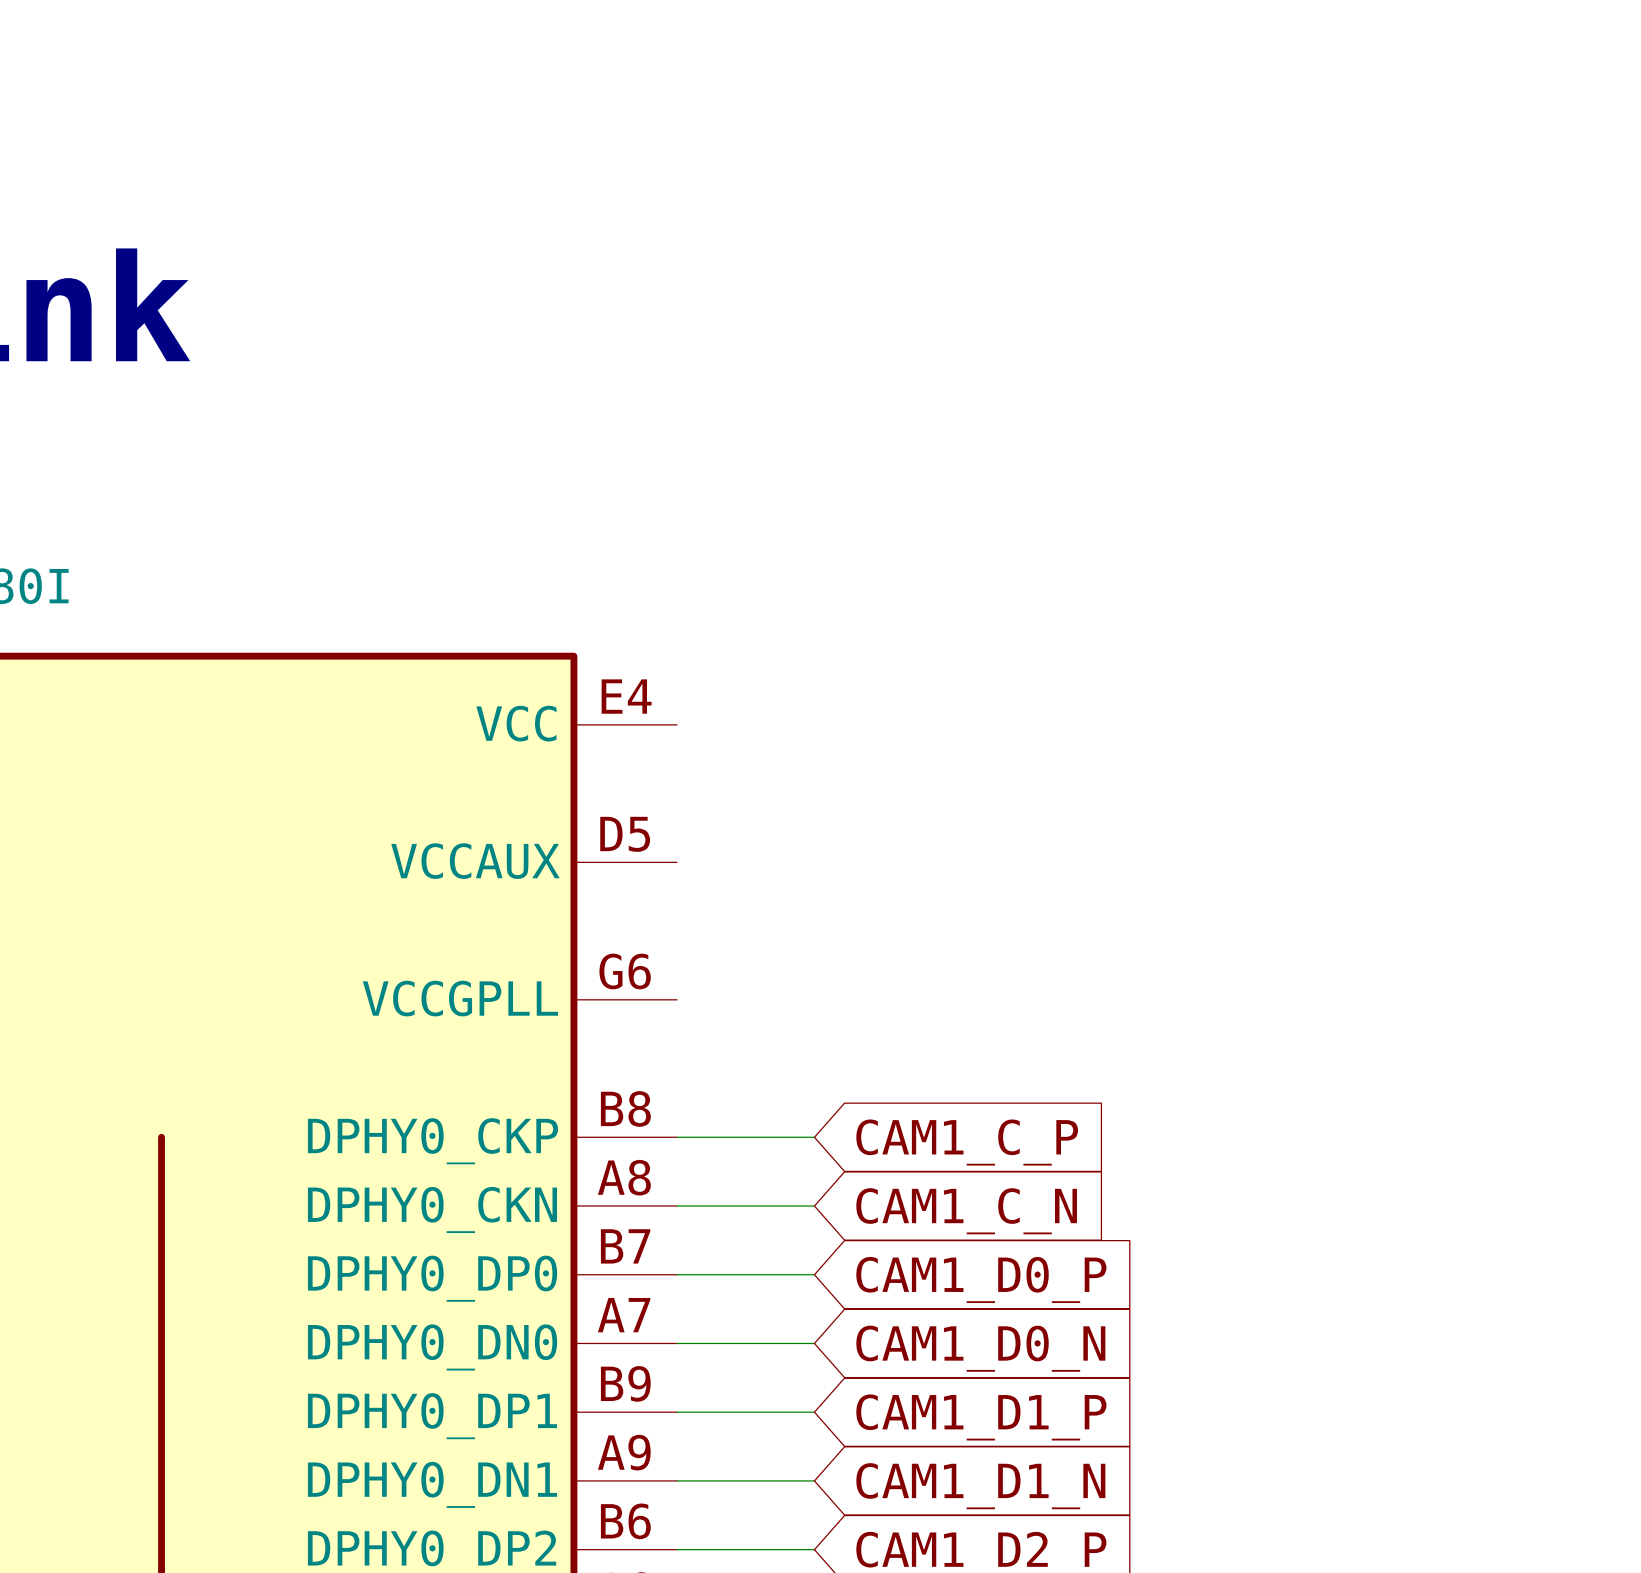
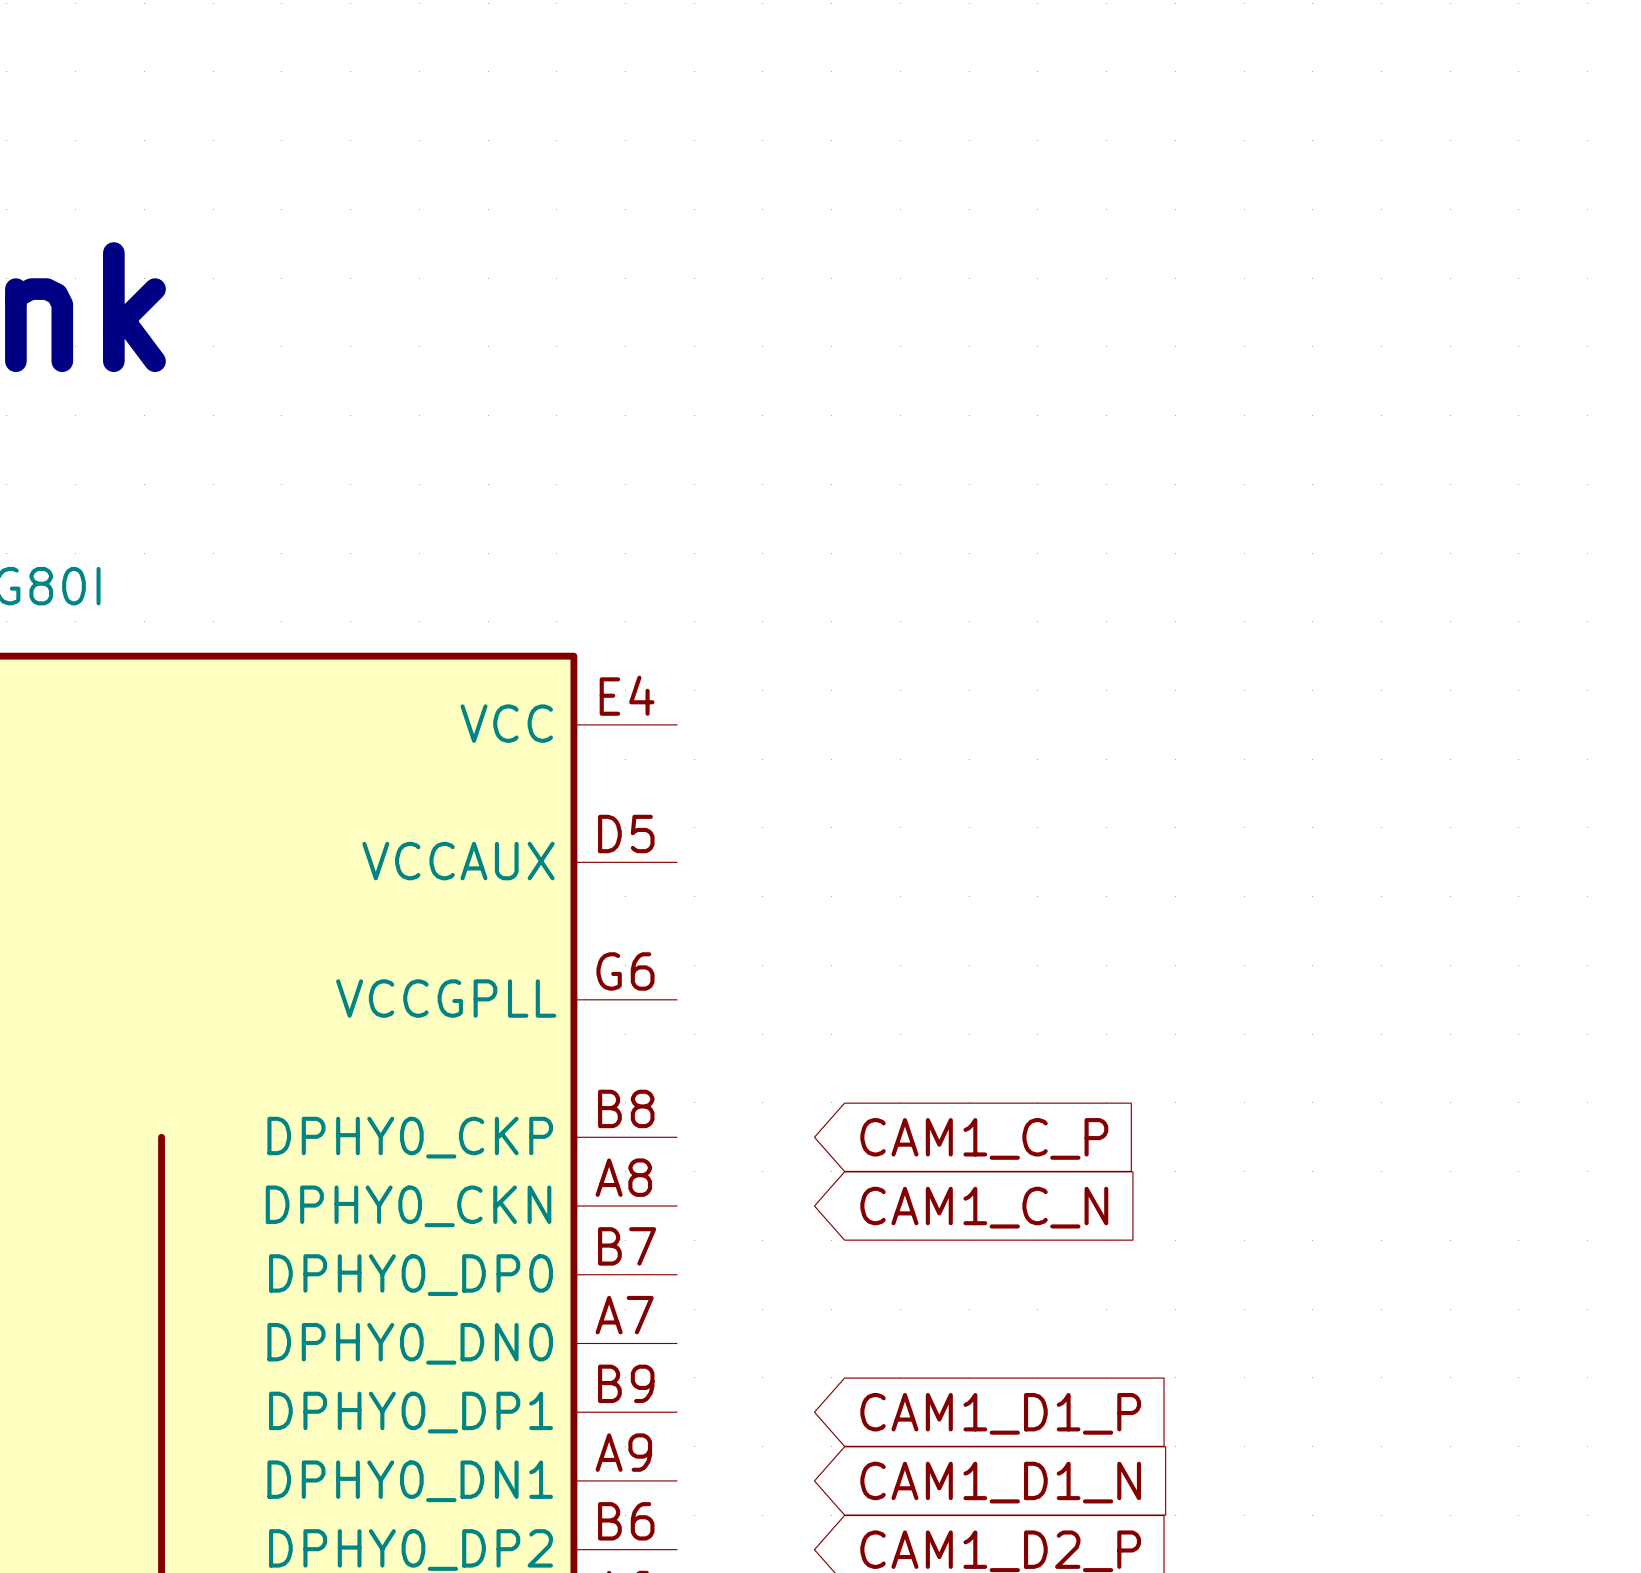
wire: (677, 1137) (814, 1137) -> none
wire: (677, 1206) (814, 1206) -> none
wire: (677, 1274) (814, 1274) -> none
global label: CAM1_D0_P (981, 1279) -> none
wire: (677, 1343) (814, 1343) -> none
global label: CAM1_D0_N (980, 1348) -> none
wire: (677, 1412) (814, 1412) -> none
wire: (677, 1480) (814, 1480) -> none
wire: (677, 1549) (814, 1549) -> none

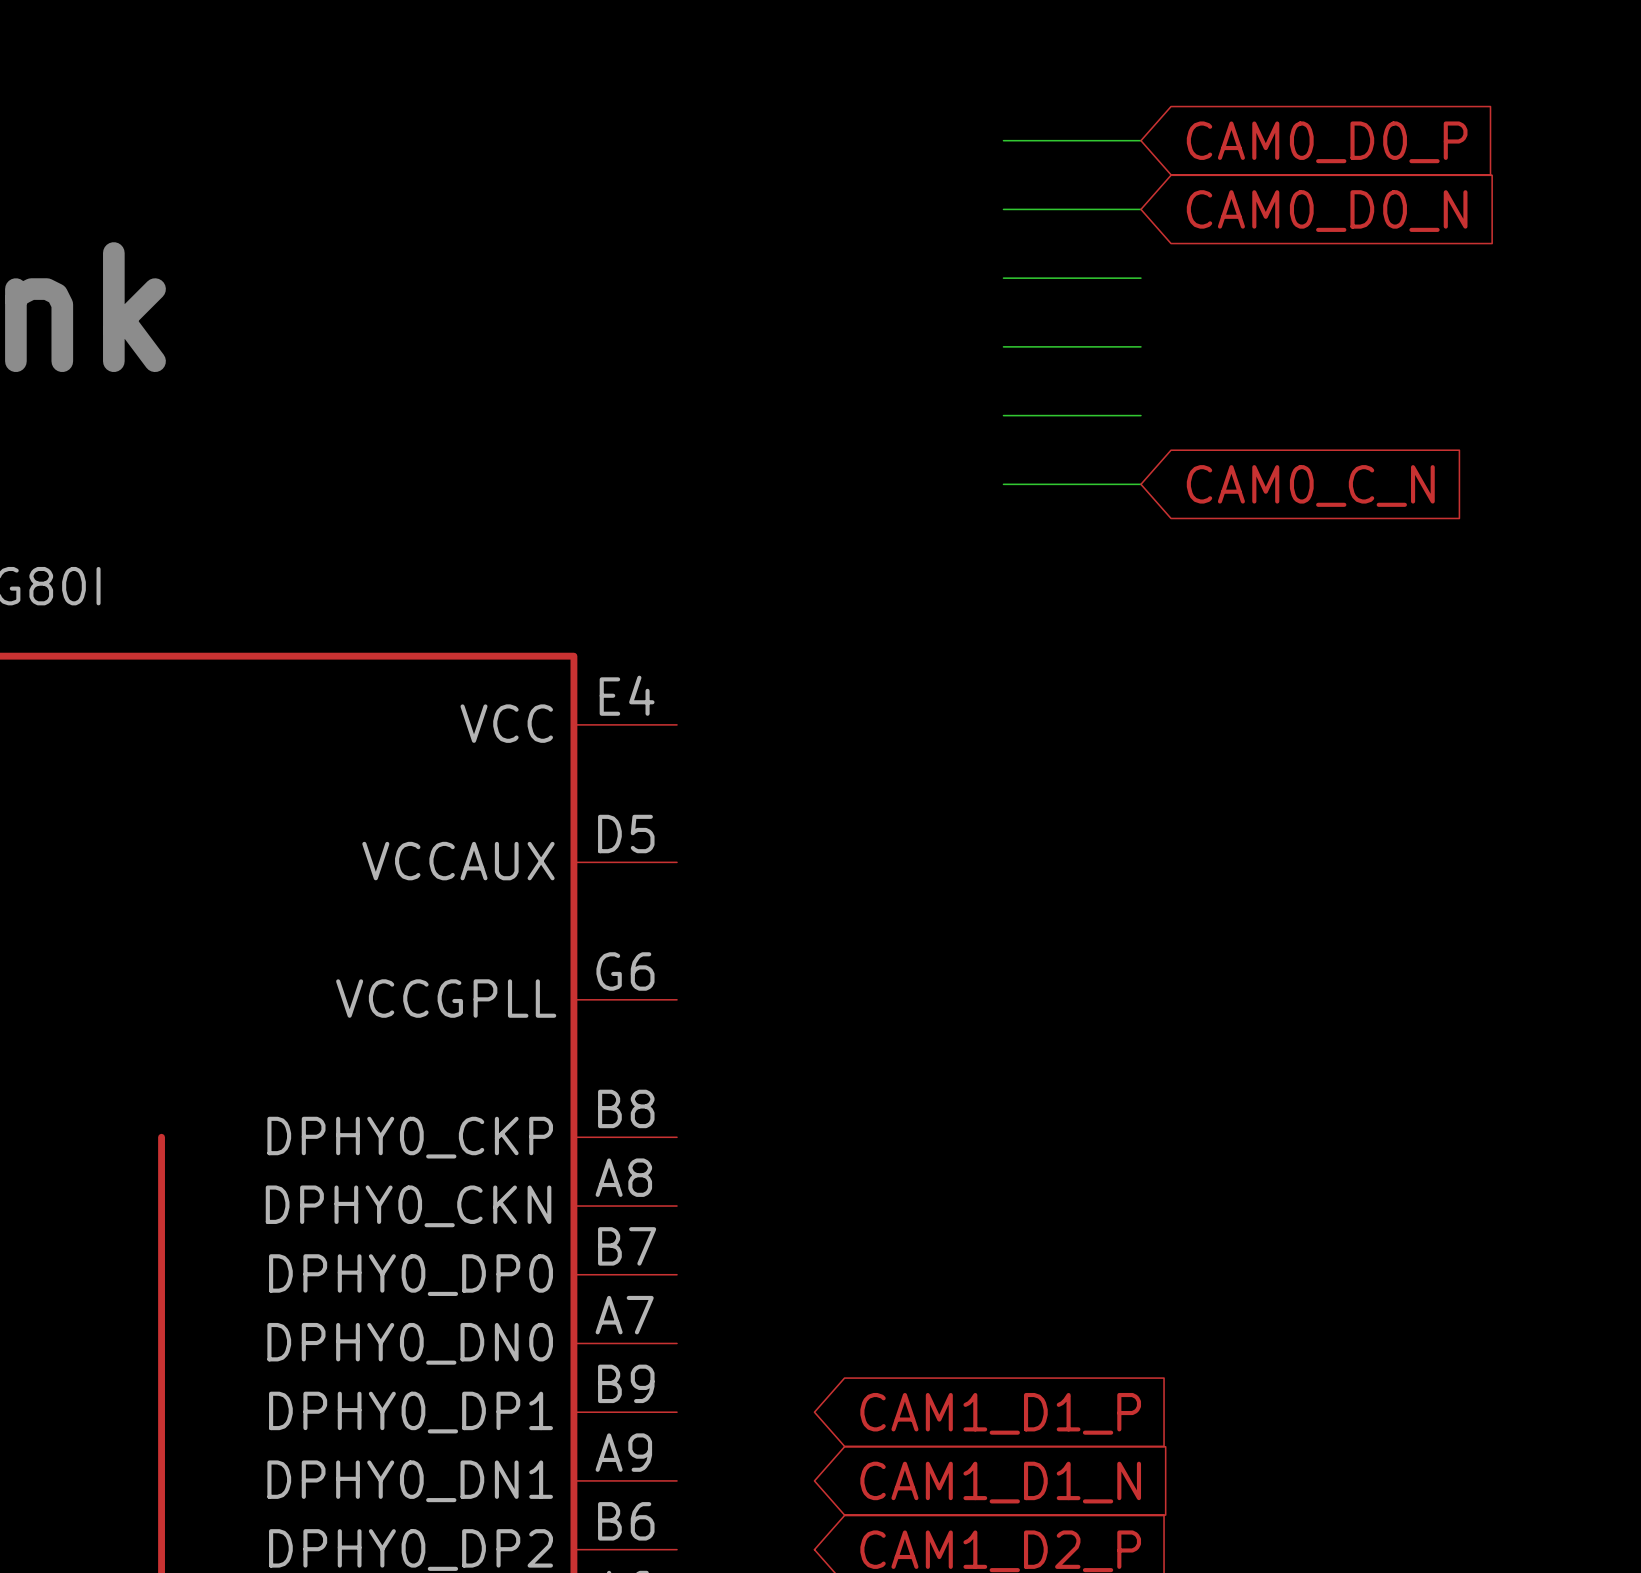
wire: none -> (1003, 140) (1140, 140)
global label: none -> CAM0_D0_P (1327, 142)
wire: none -> (1003, 209) (1140, 209)
global label: none -> CAM0_D0_N (1327, 211)
wire: none -> (1003, 278) (1140, 278)
wire: none -> (1003, 346) (1140, 346)
wire: none -> (1003, 415) (1140, 415)
wire: none -> (1003, 484) (1140, 484)
global label: none -> CAM0_C_N (1310, 485)
global label: CAM1_C_P (984, 1138) -> none
global label: CAM1_C_N (984, 1207) -> none

